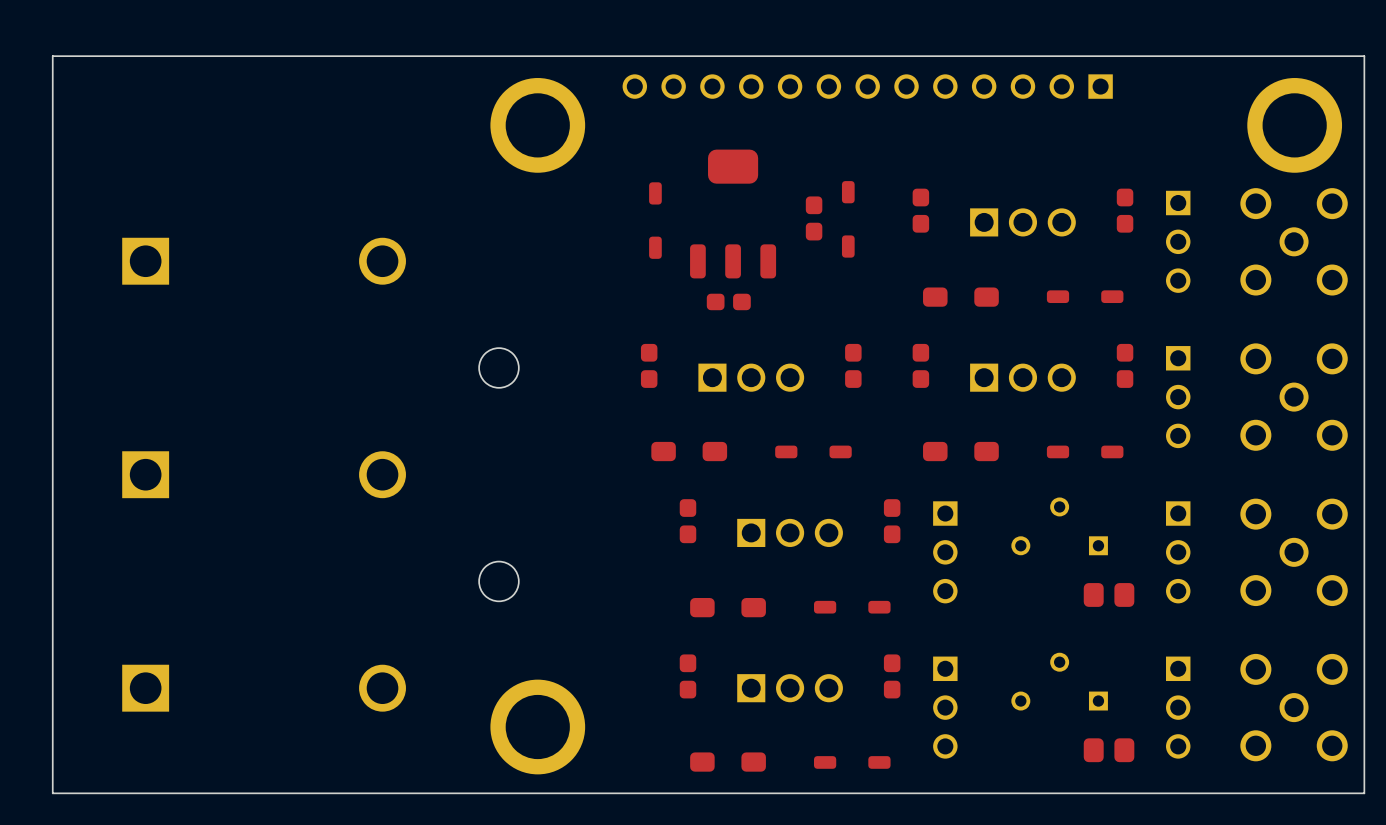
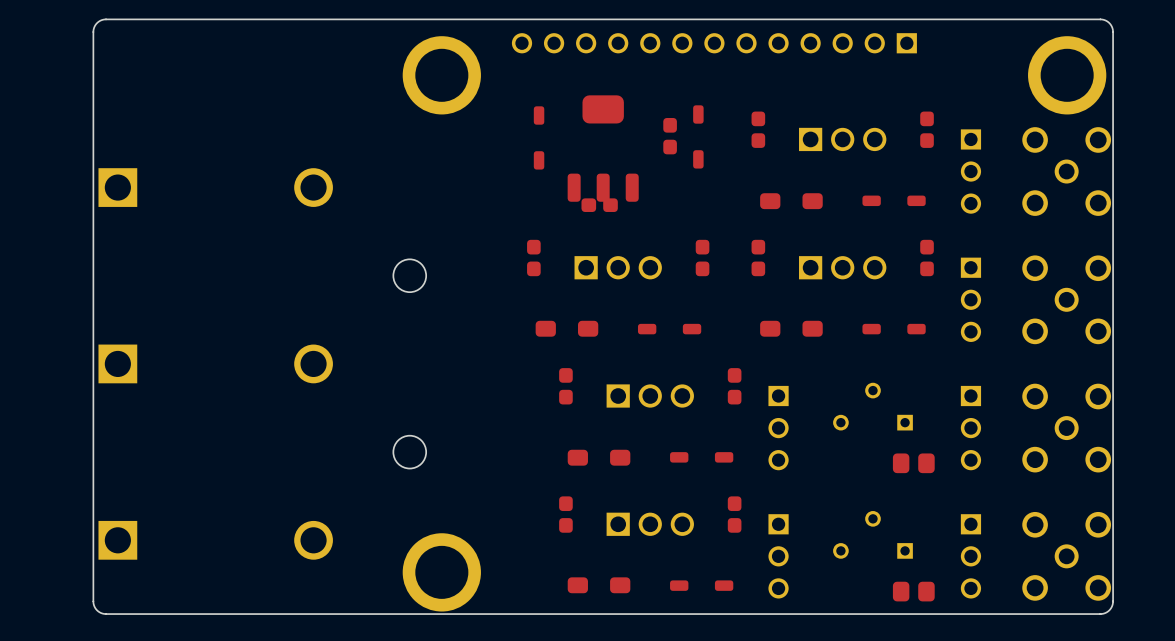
board edge: (1364, 56) (52, 56) (52, 793) (1364, 793) (1364, 56) -> (1100, 19) (1109, 23) (1113, 32) (1113, 601) (1111, 608) (1107, 612) (1100, 614) (106, 614) (99, 612) (95, 608) (93, 601) (93, 32) (95, 25) (99, 21) (106, 19) (1100, 19)
part position: (920, 210) -> (758, 129)
part position: (1125, 210) -> (927, 129)
part position: (814, 218) -> (670, 136)
part position: (848, 219) -> (698, 136)
part position: (655, 220) -> (539, 137)
part position: (1022, 222) -> (842, 139)
part position: (1085, 296) -> (894, 200)
part position: (960, 297) -> (791, 201)
part position: (728, 301) -> (599, 205)
part position: (649, 365) -> (533, 258)
part position: (853, 365) -> (702, 258)
part position: (920, 365) -> (758, 258)
part position: (1125, 365) -> (927, 258)
part position: (751, 377) -> (618, 267)
part position: (1022, 377) -> (842, 267)
part position: (689, 451) -> (566, 328)
part position: (813, 451) -> (669, 329)
part position: (960, 451) -> (791, 328)
part position: (1085, 451) -> (894, 329)
part position: (687, 521) -> (565, 386)
part position: (892, 521) -> (734, 386)
part position: (790, 532) -> (650, 396)
part position: (728, 607) -> (599, 457)
part position: (852, 607) -> (701, 457)
part position: (687, 676) -> (565, 514)
part position: (892, 676) -> (734, 514)
part position: (790, 688) -> (650, 524)
part position: (728, 762) -> (599, 585)
part position: (852, 762) -> (701, 585)

